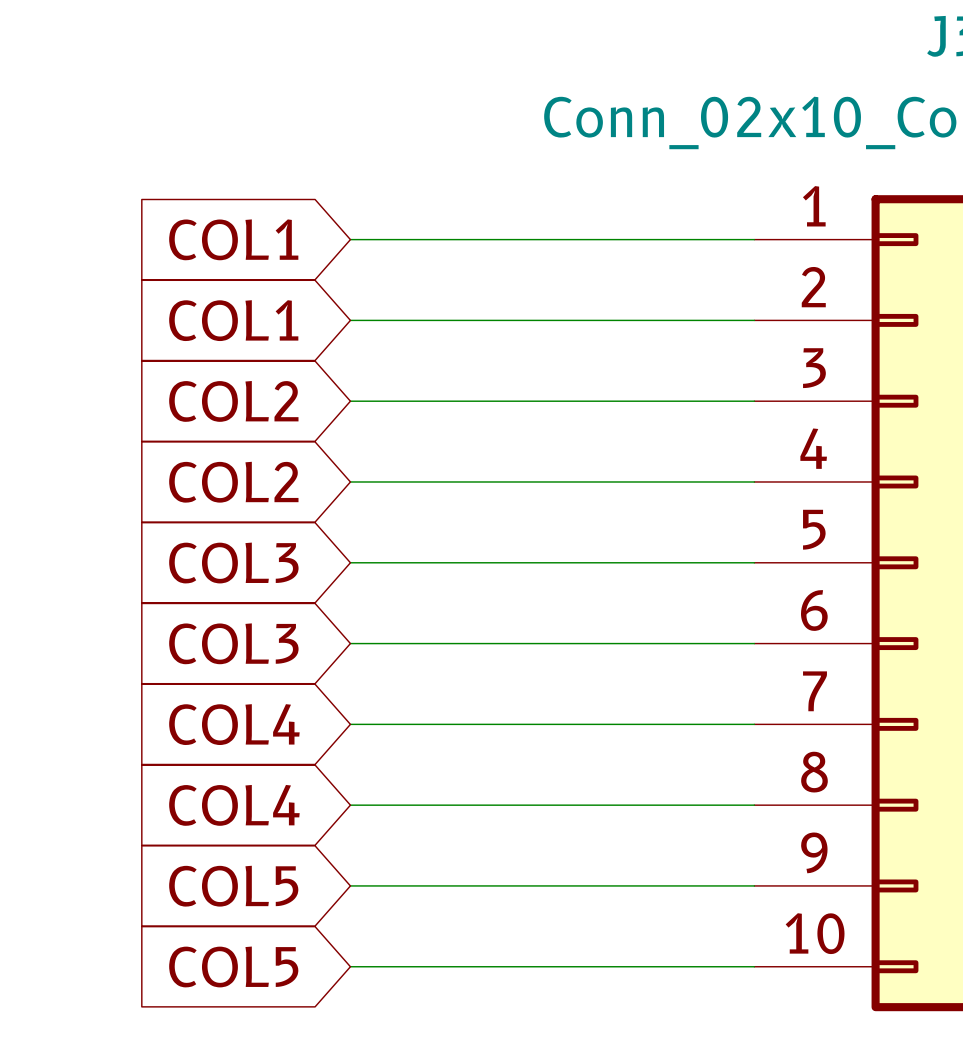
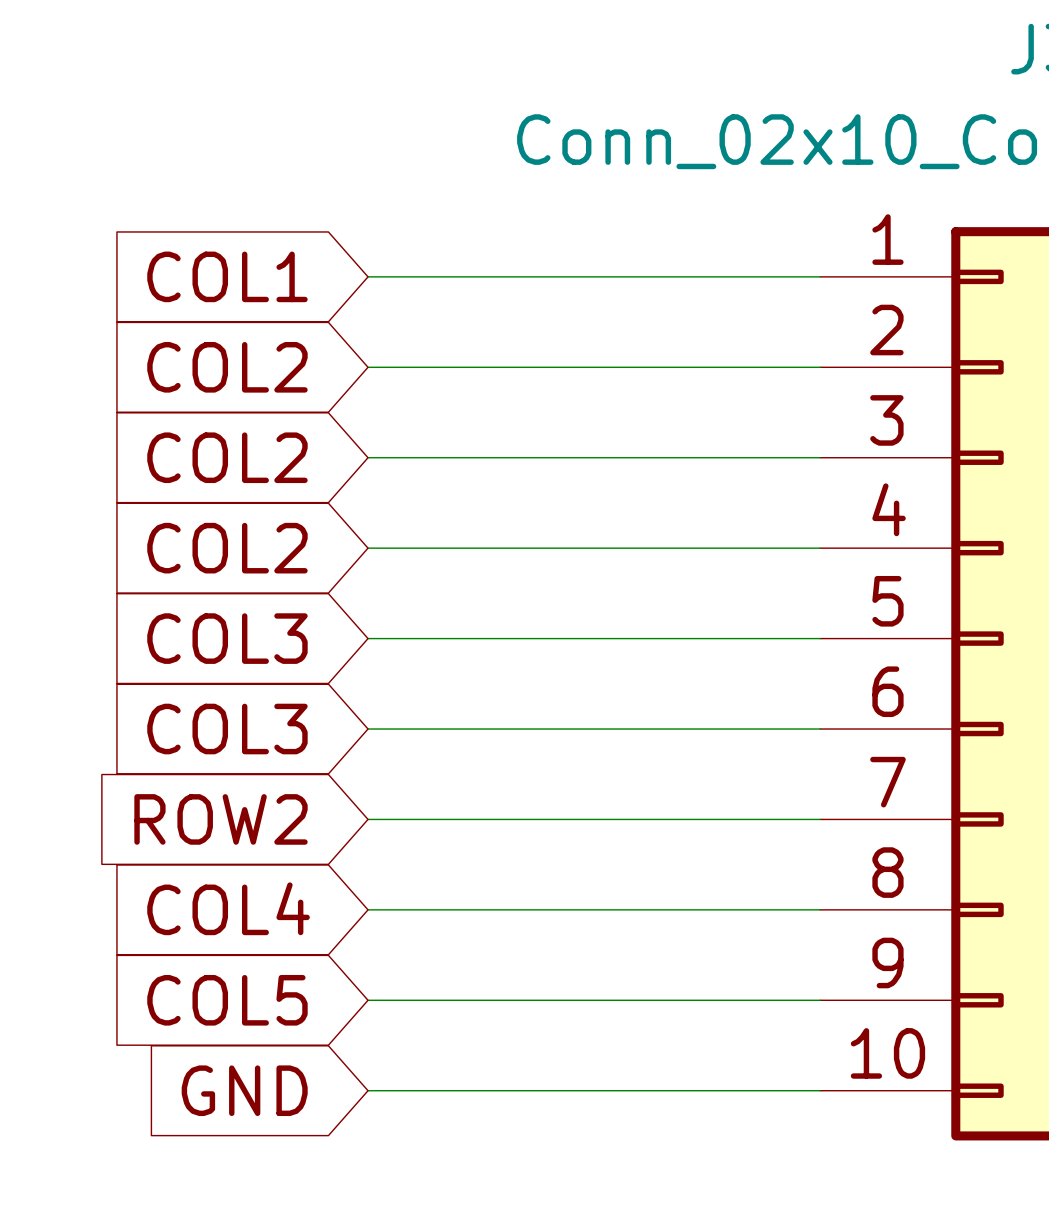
global label: COL1 (233, 320) -> COL2 (227, 367)
global label: COL4 (234, 724) -> ROW2 (221, 819)
global label: COL5 (233, 966) -> GND (244, 1090)

